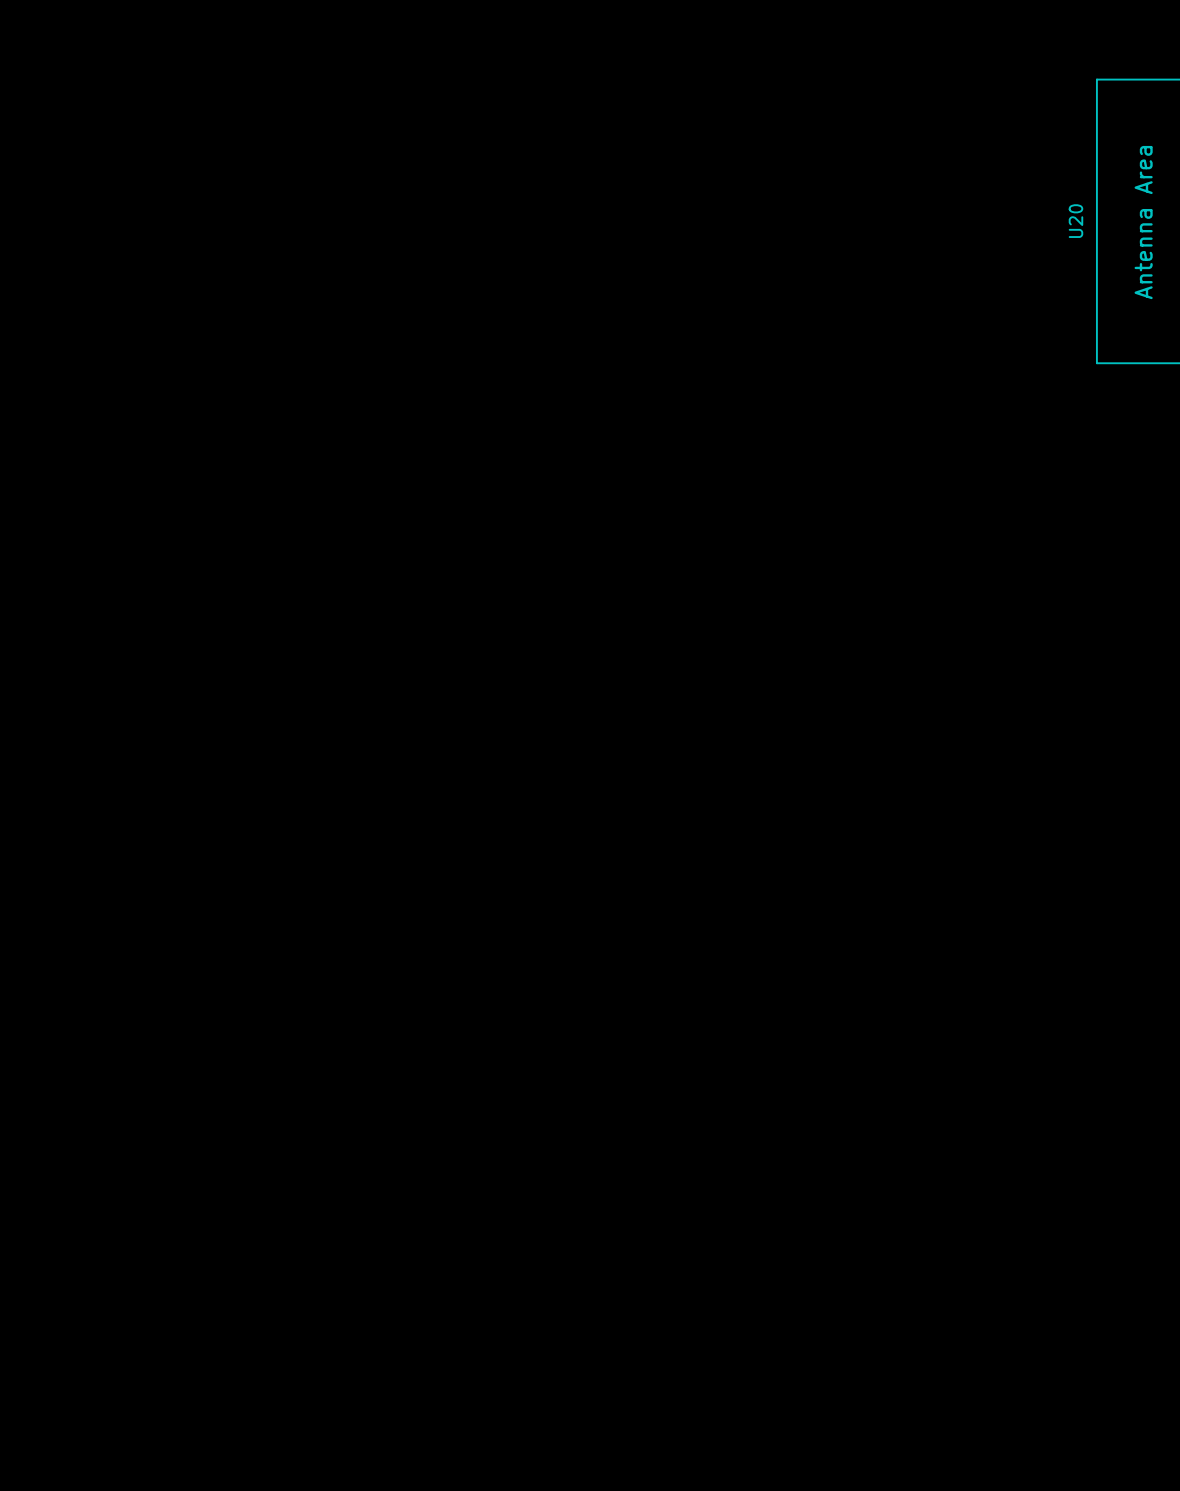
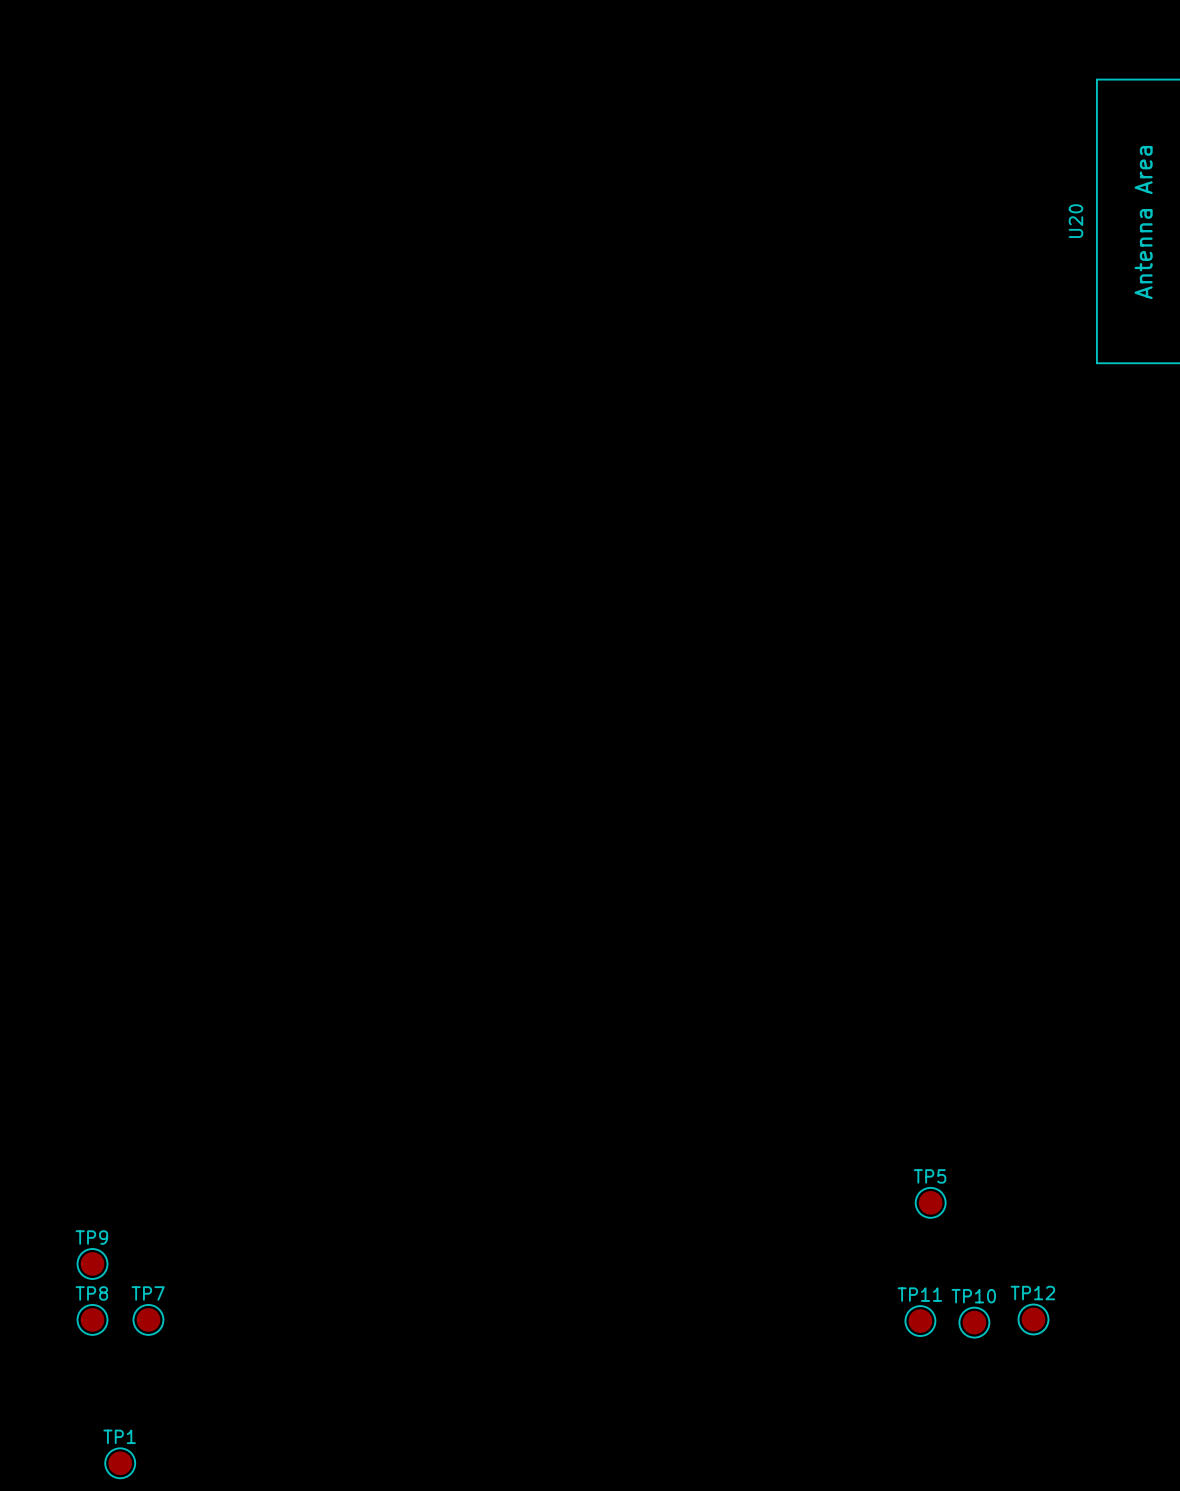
TP5: none -> (930, 1202)
TP9: none -> (92, 1263)
TP8: none -> (92, 1319)
TP7: none -> (148, 1319)
TP12: none -> (1033, 1319)
TP11: none -> (920, 1321)
TP10: none -> (974, 1322)
TP1: none -> (120, 1463)

